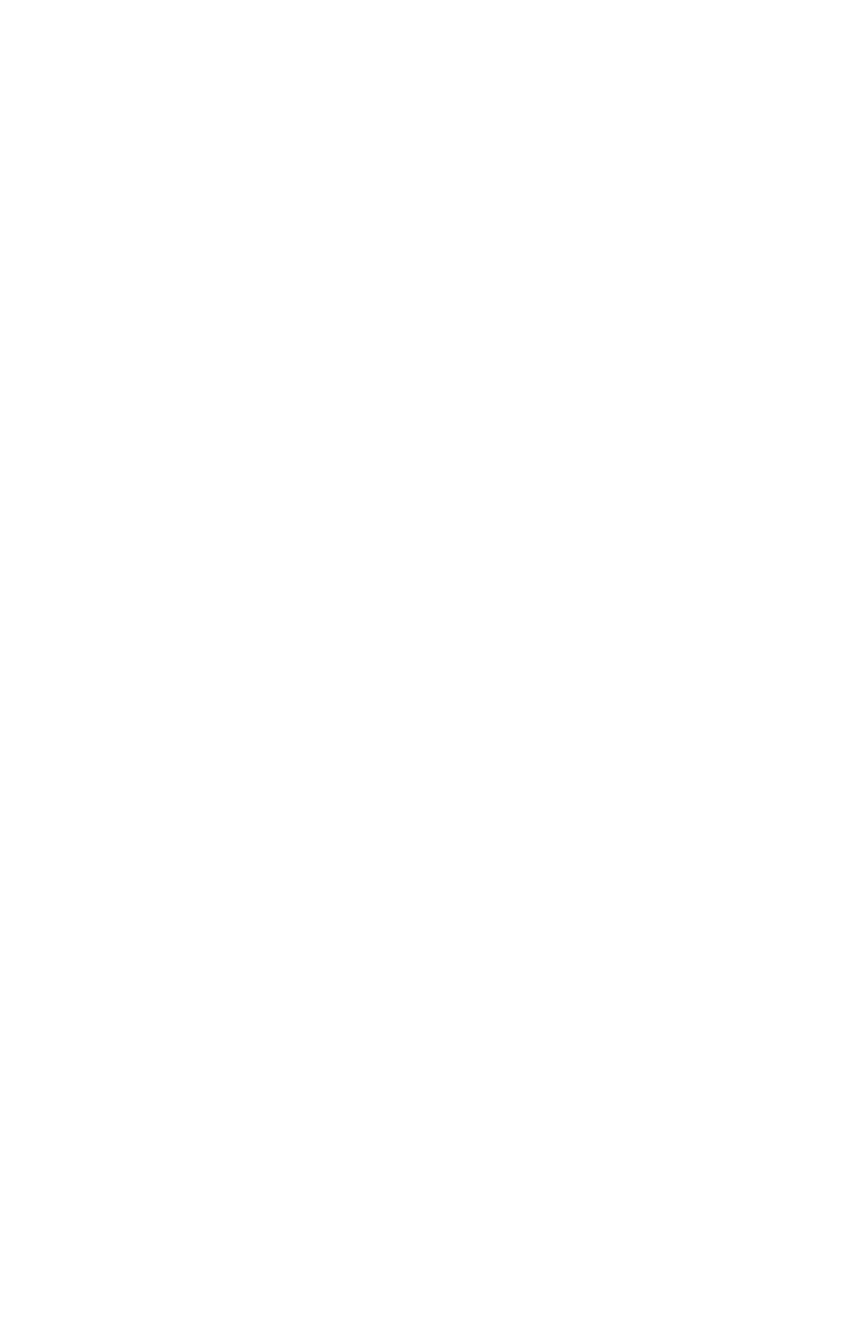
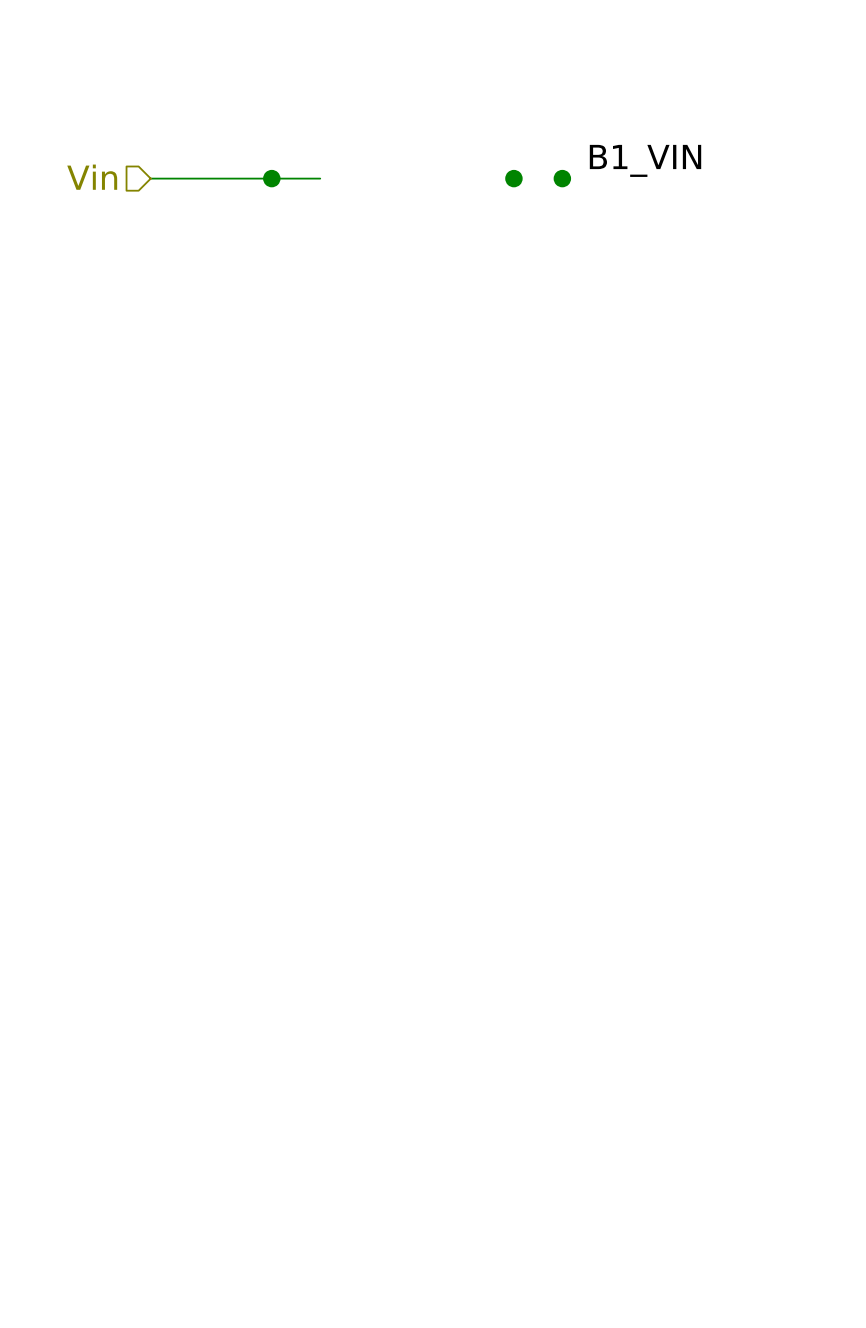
label: none -> B1_VIN (645, 160)
hierarchical label: none -> Vin (92, 177)
wire: none -> (150, 178) (320, 178)
junction: none -> (271, 178)
junction: none -> (513, 178)
junction: none -> (562, 178)

